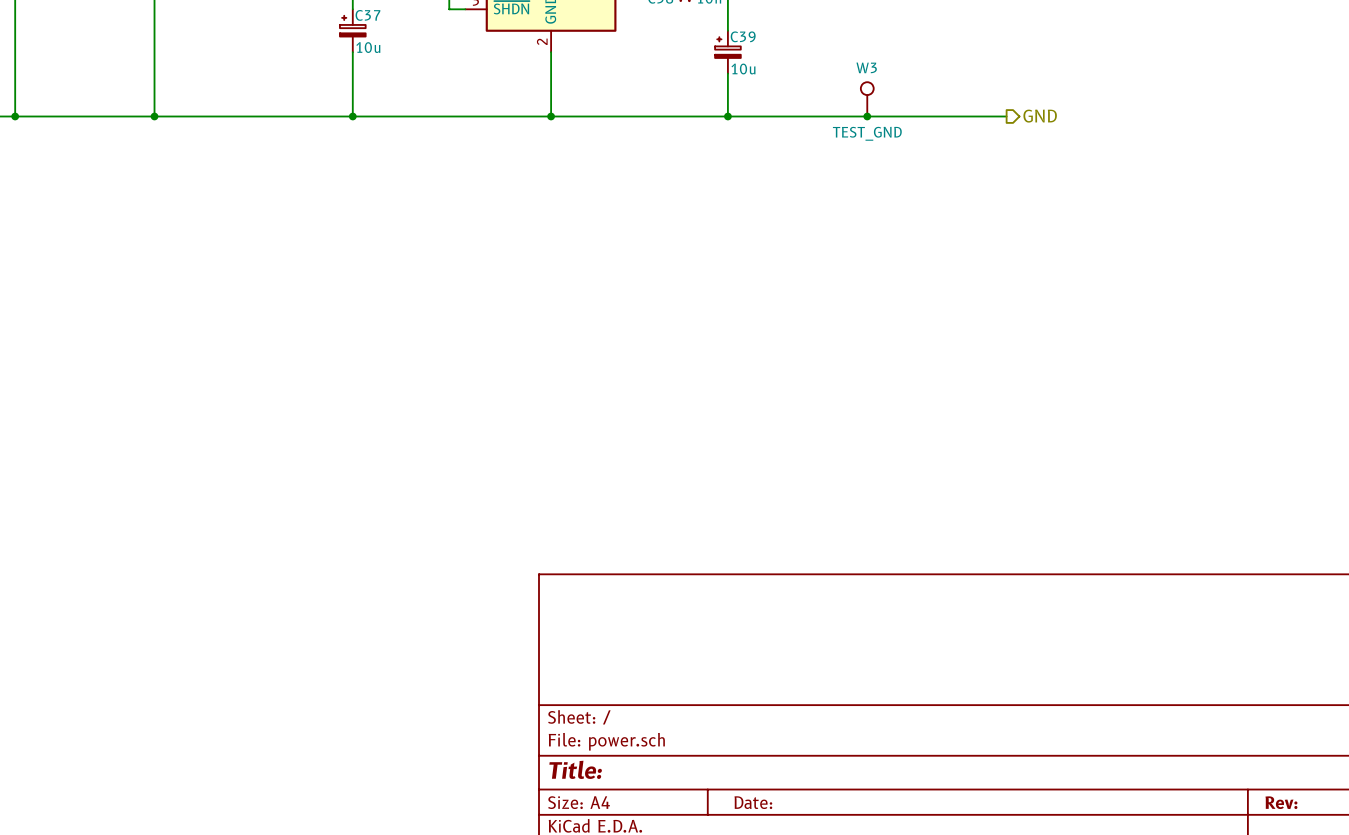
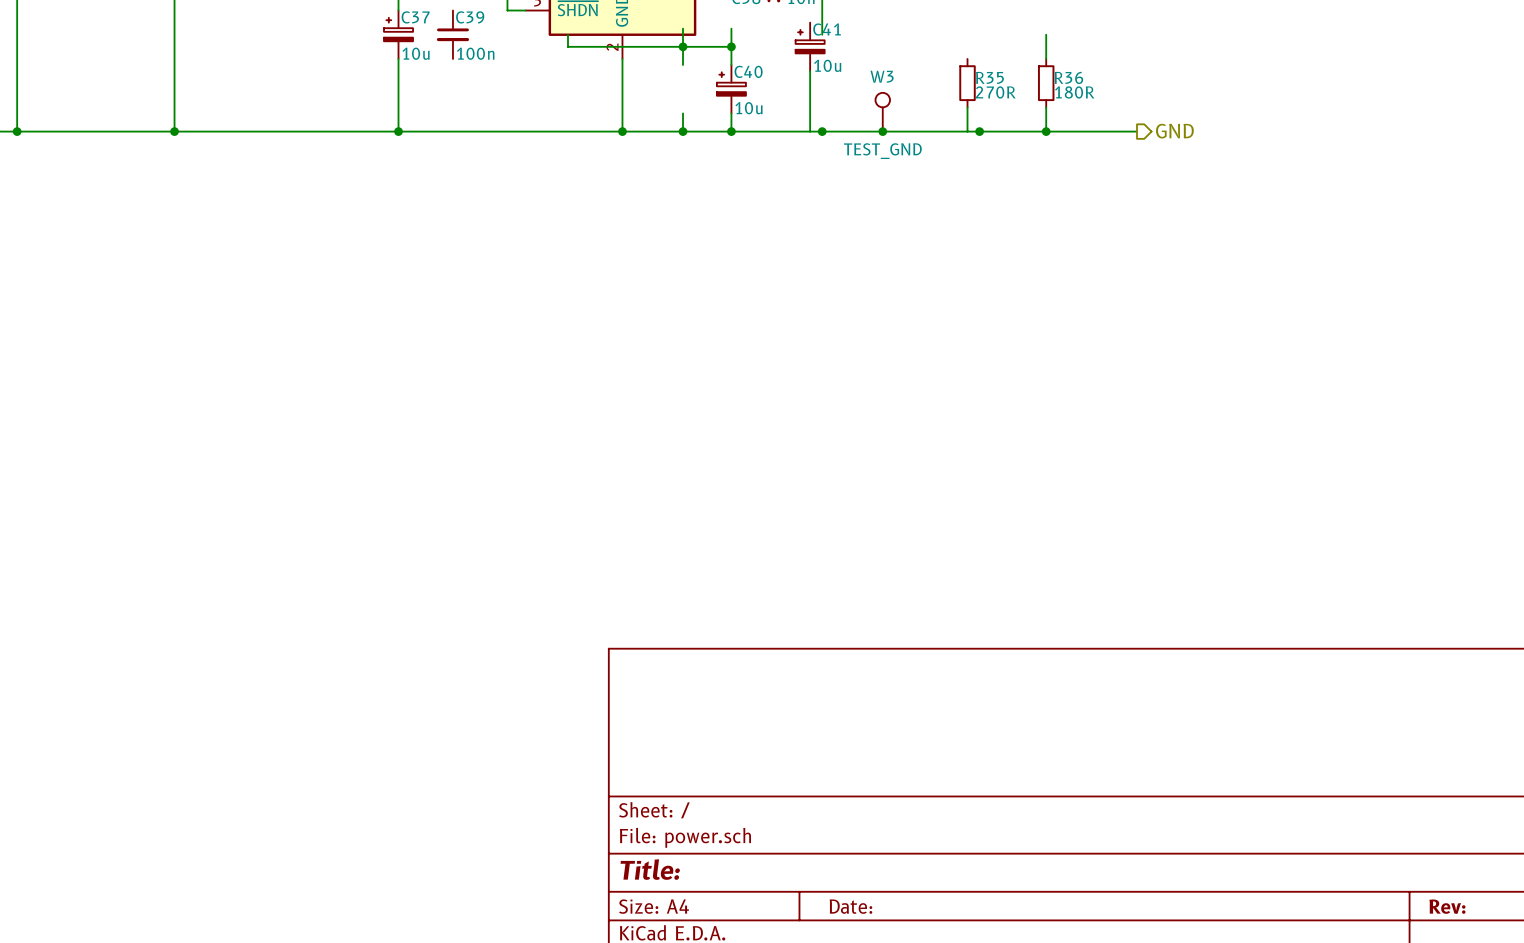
wire: none -> (683, 28) (683, 65)
wire: none -> (731, 28) (731, 65)
wire: none -> (567, 34) (567, 46) (731, 46)
C39 symbol: [715, 30, 741, 74] -> [436, 10, 470, 59]
wire: none -> (1046, 34) (1046, 58)
junction: none -> (683, 46)
junction: none -> (731, 46)
C41: none -> 10u (810, 46)
wire: none -> (810, 71) (810, 131)
C39 value: 10u (743, 68) -> 100n (475, 53)
wire: (727, 73) (727, 116) -> none
R35: none -> 270R (967, 83)
R36: none -> 180R (1046, 83)
C40: none -> 10u (731, 89)
wire: none -> (967, 107) (967, 131)
wire: none -> (1046, 107) (1046, 131)
W3 position: (867, 99) -> (882, 112)
wire: none -> (683, 113) (683, 131)
wire: none -> (731, 113) (731, 131)
junction: none -> (683, 131)
junction: none -> (731, 131)
junction: none -> (882, 131)
junction: none -> (1046, 131)

